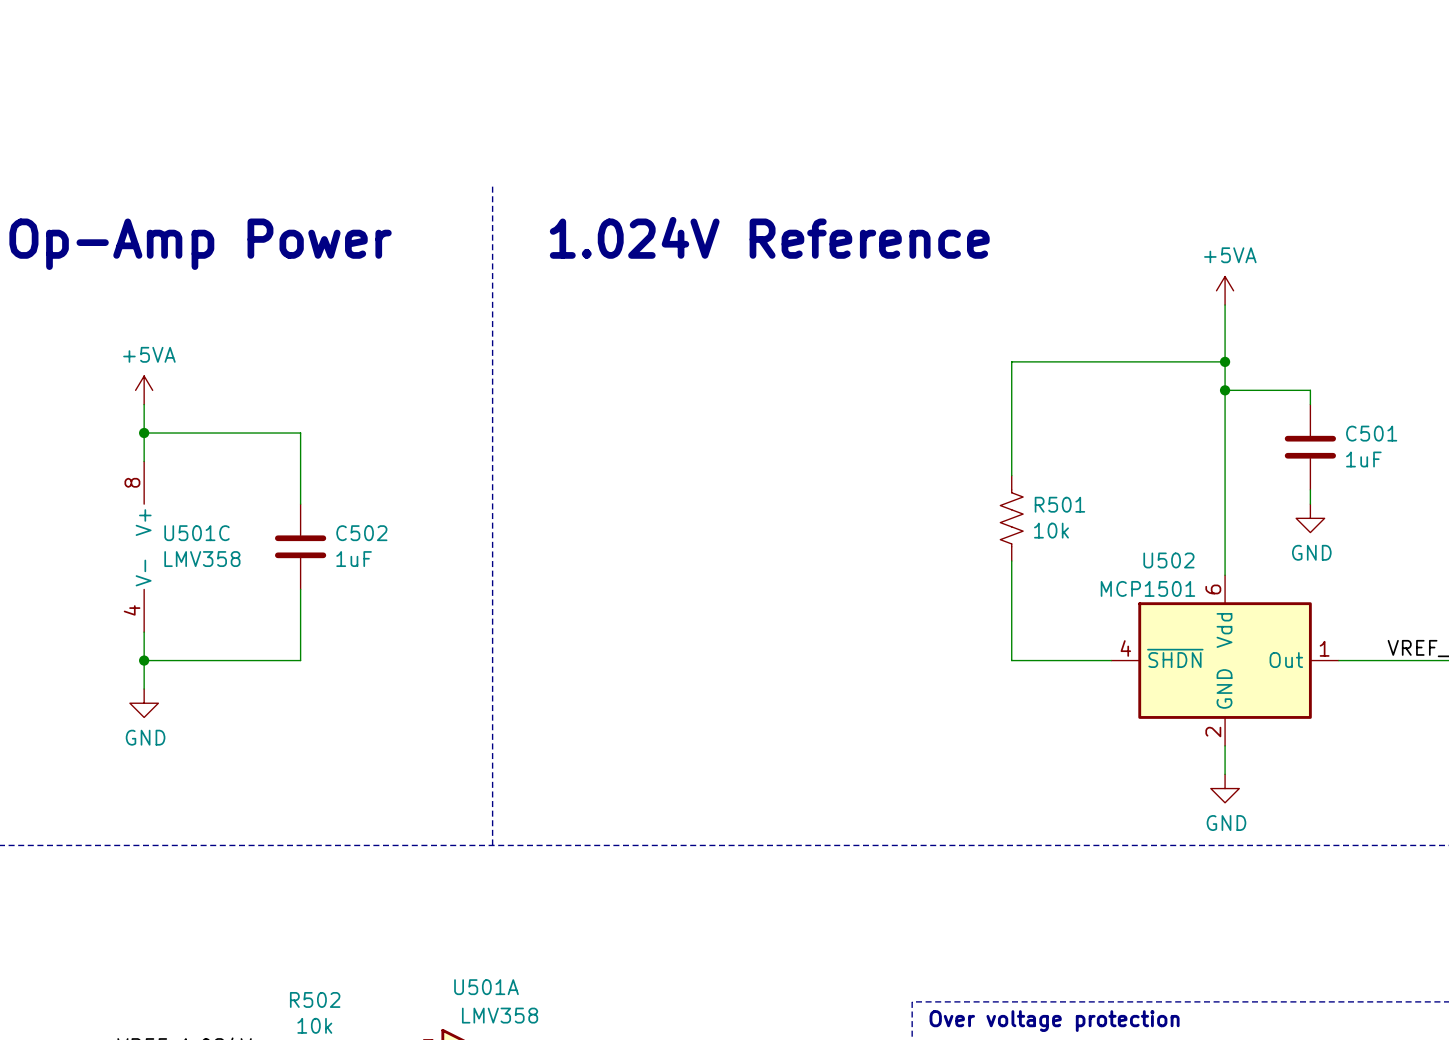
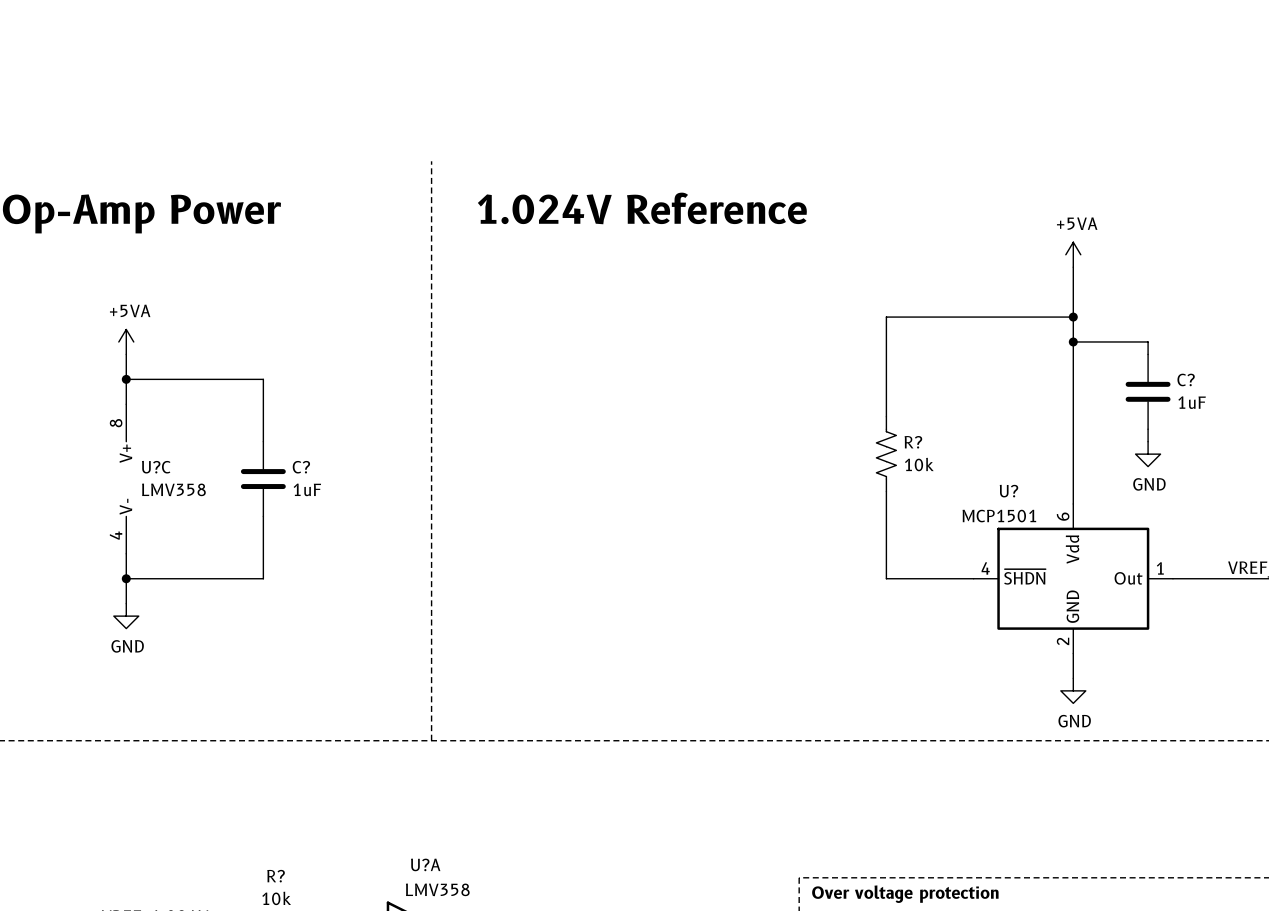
C501 name: C501 (1371, 433) -> C? (1186, 379)
R501 name: R501 (1059, 504) -> R? (913, 442)
U501C name: U501C (196, 533) -> U?C (156, 467)
C502 name: C502 (361, 533) -> C? (301, 467)
U502 name: U502 (1168, 560) -> U? (1008, 491)
U501A name: U501A (486, 987) -> U?A (425, 864)
R502 name: R502 (315, 999) -> R? (276, 876)

